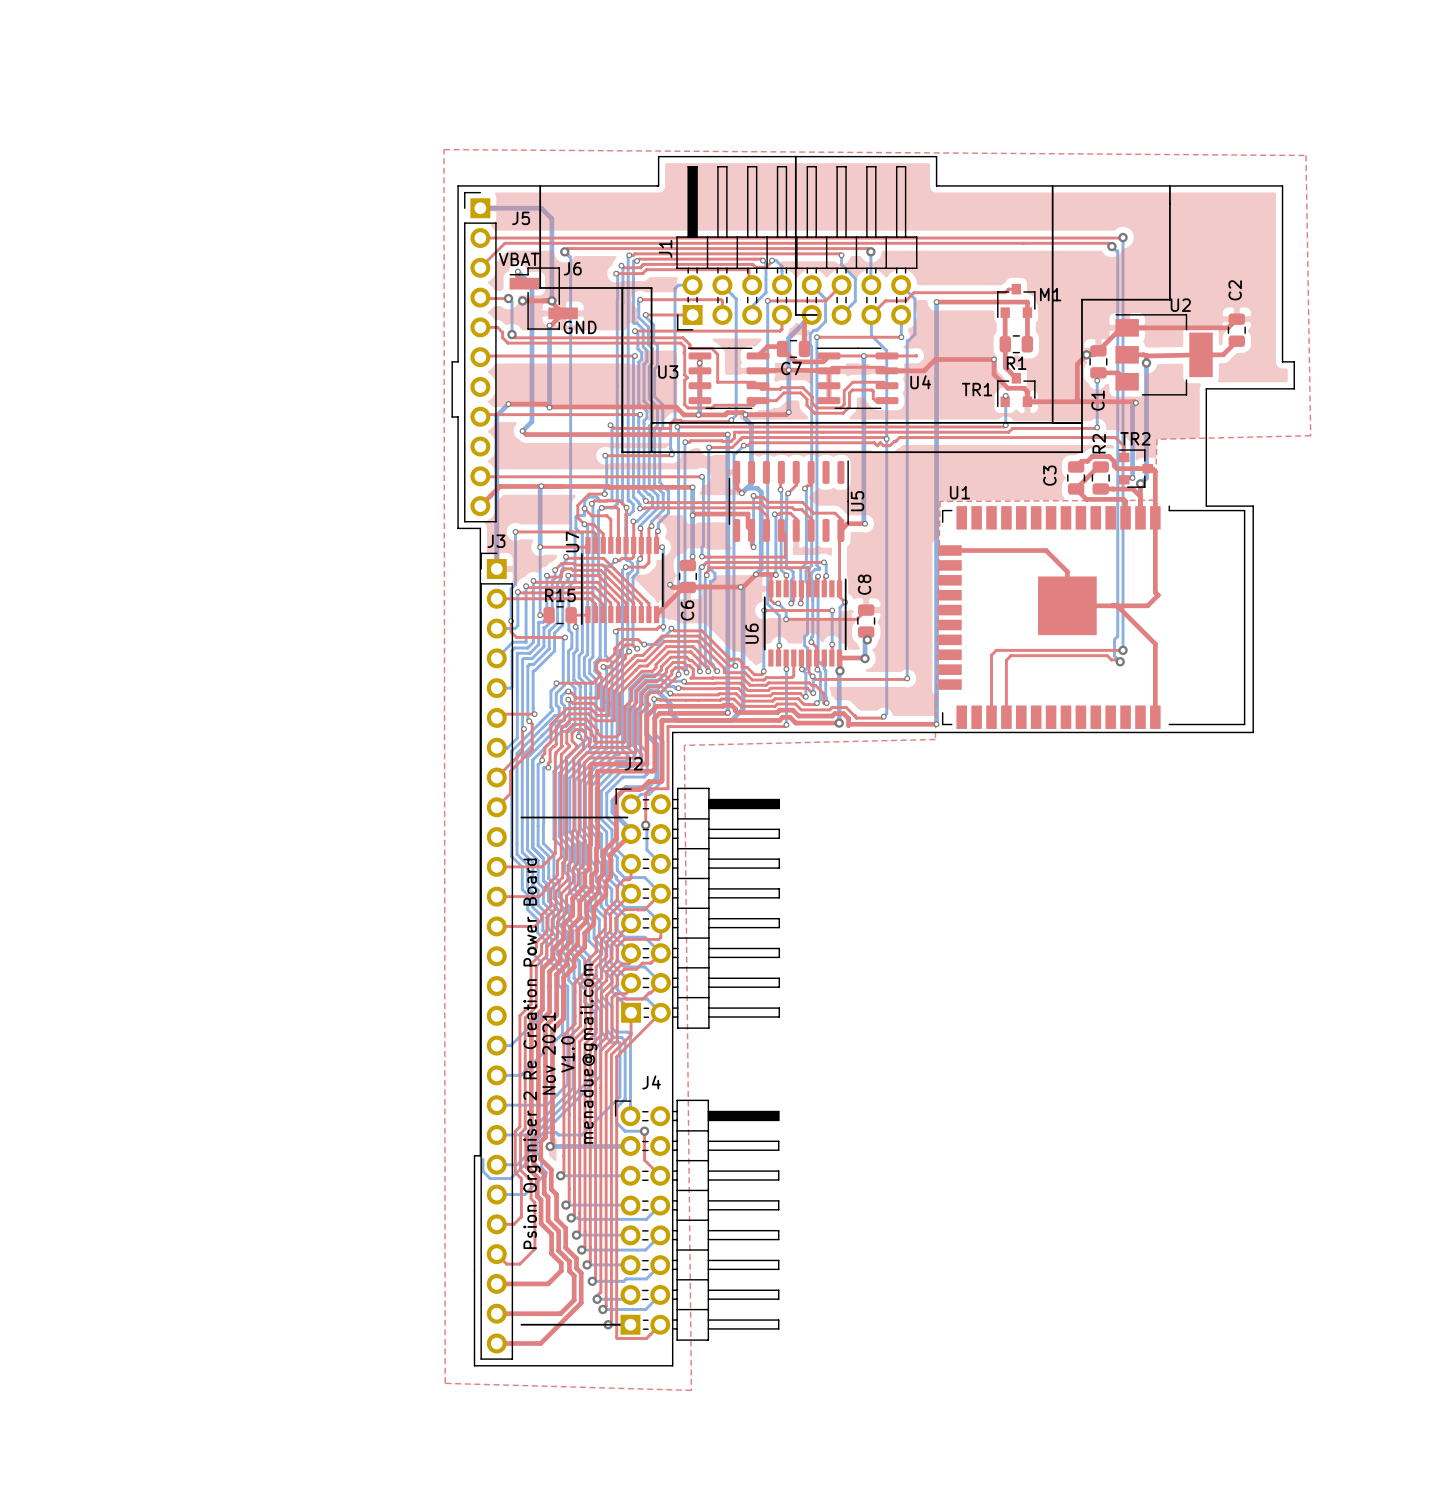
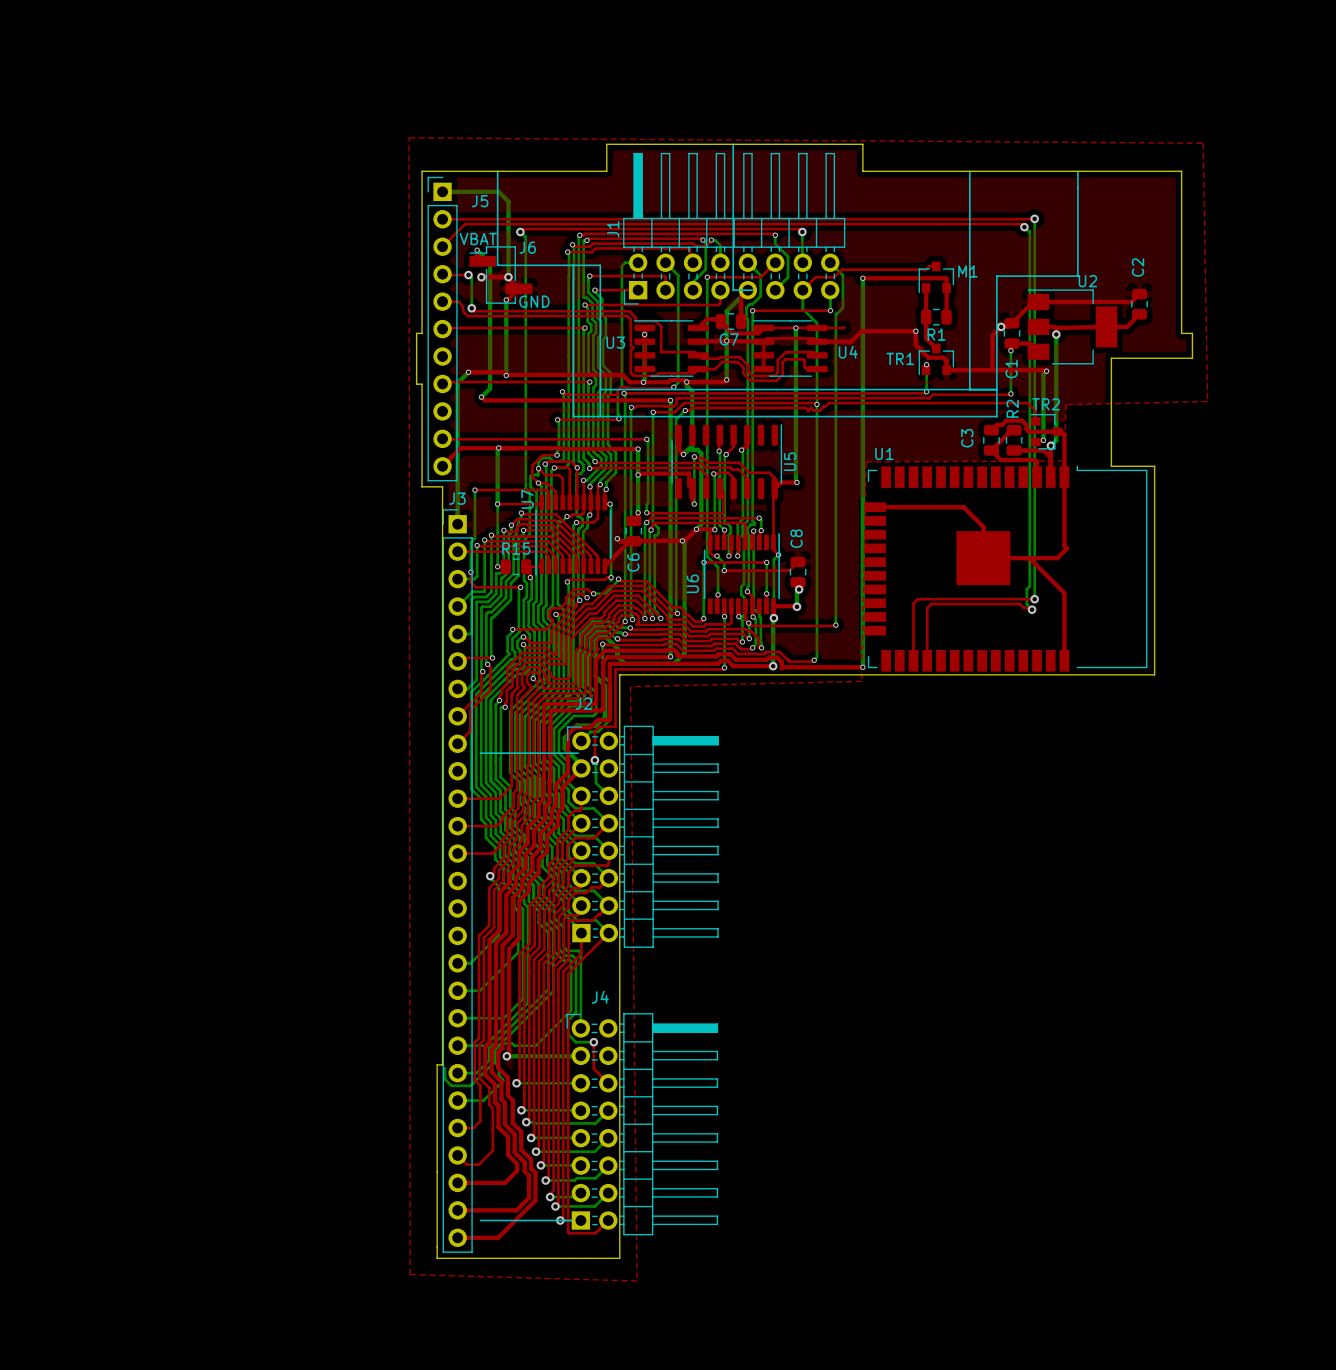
text: Psion Organiser 2 Re Creation Power Board (532, 1053) -> none
text: Nov 2021 (549, 1053) -> none
text: menadue@gmail.com (588, 1053) -> none
text: V1.0 (567, 1054) -> none

